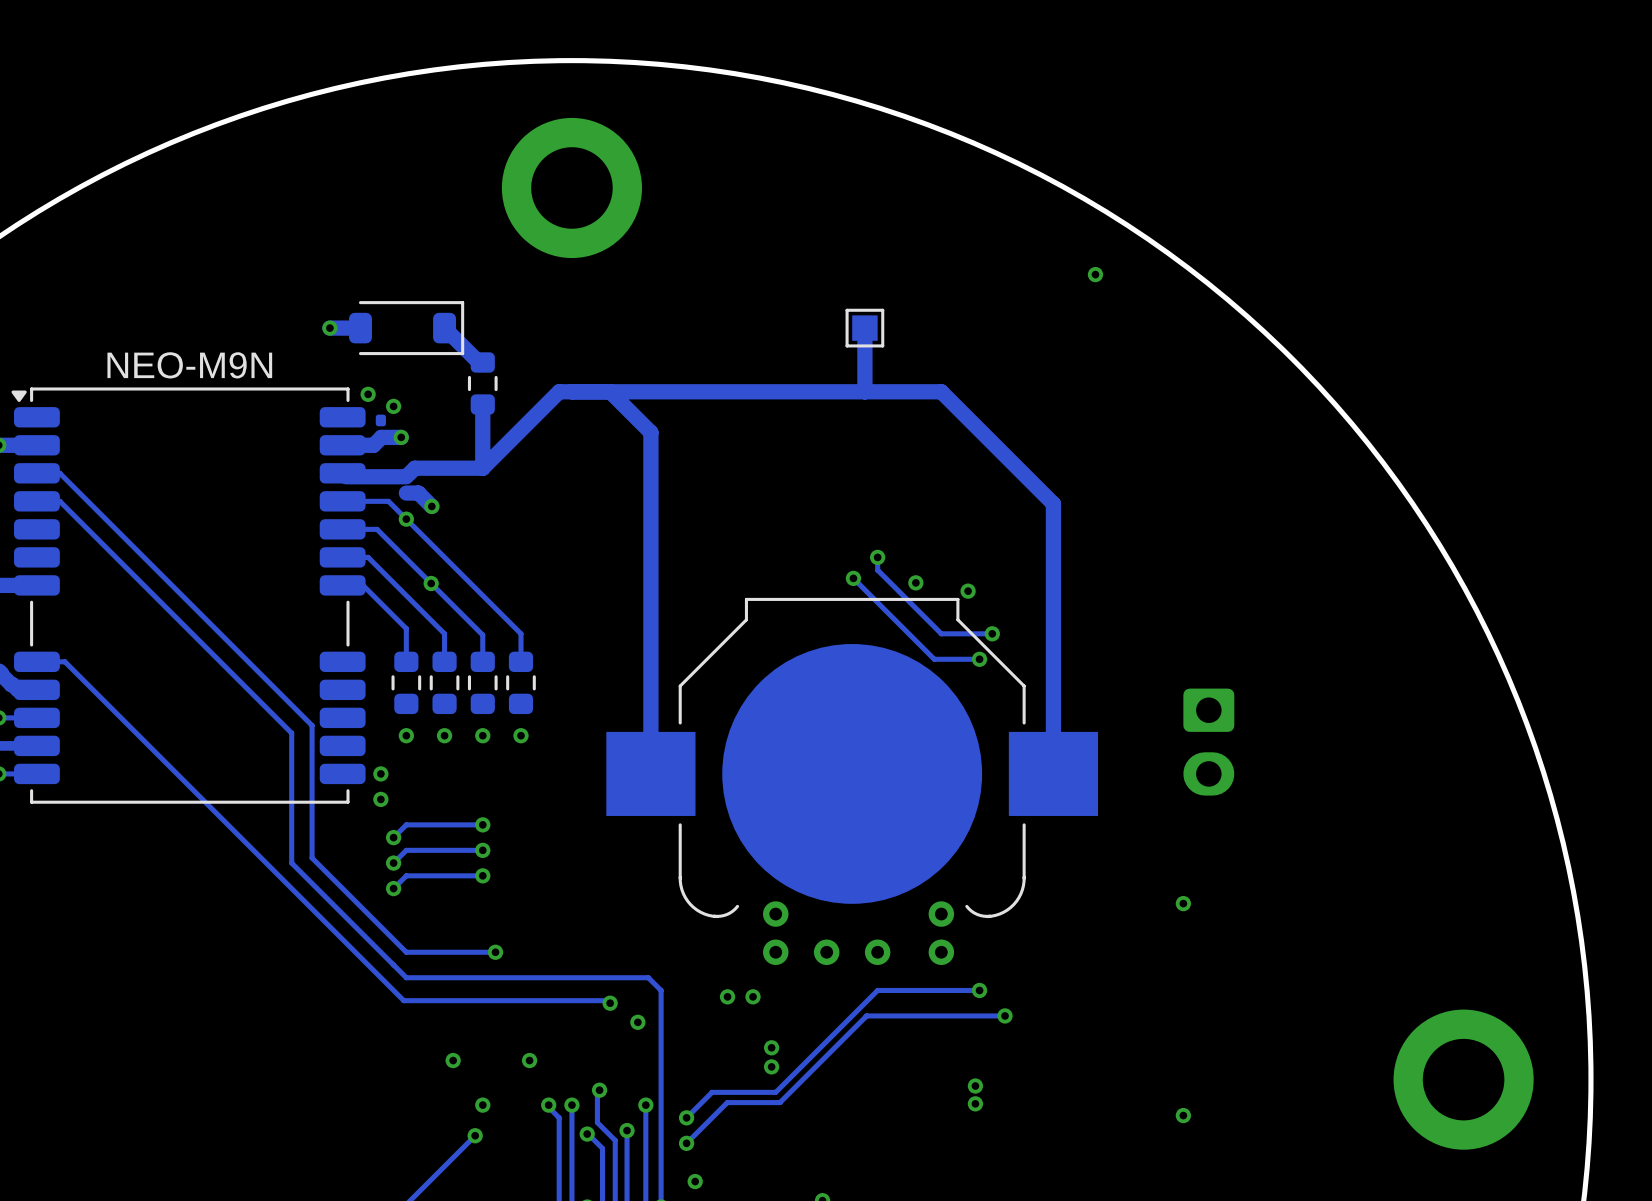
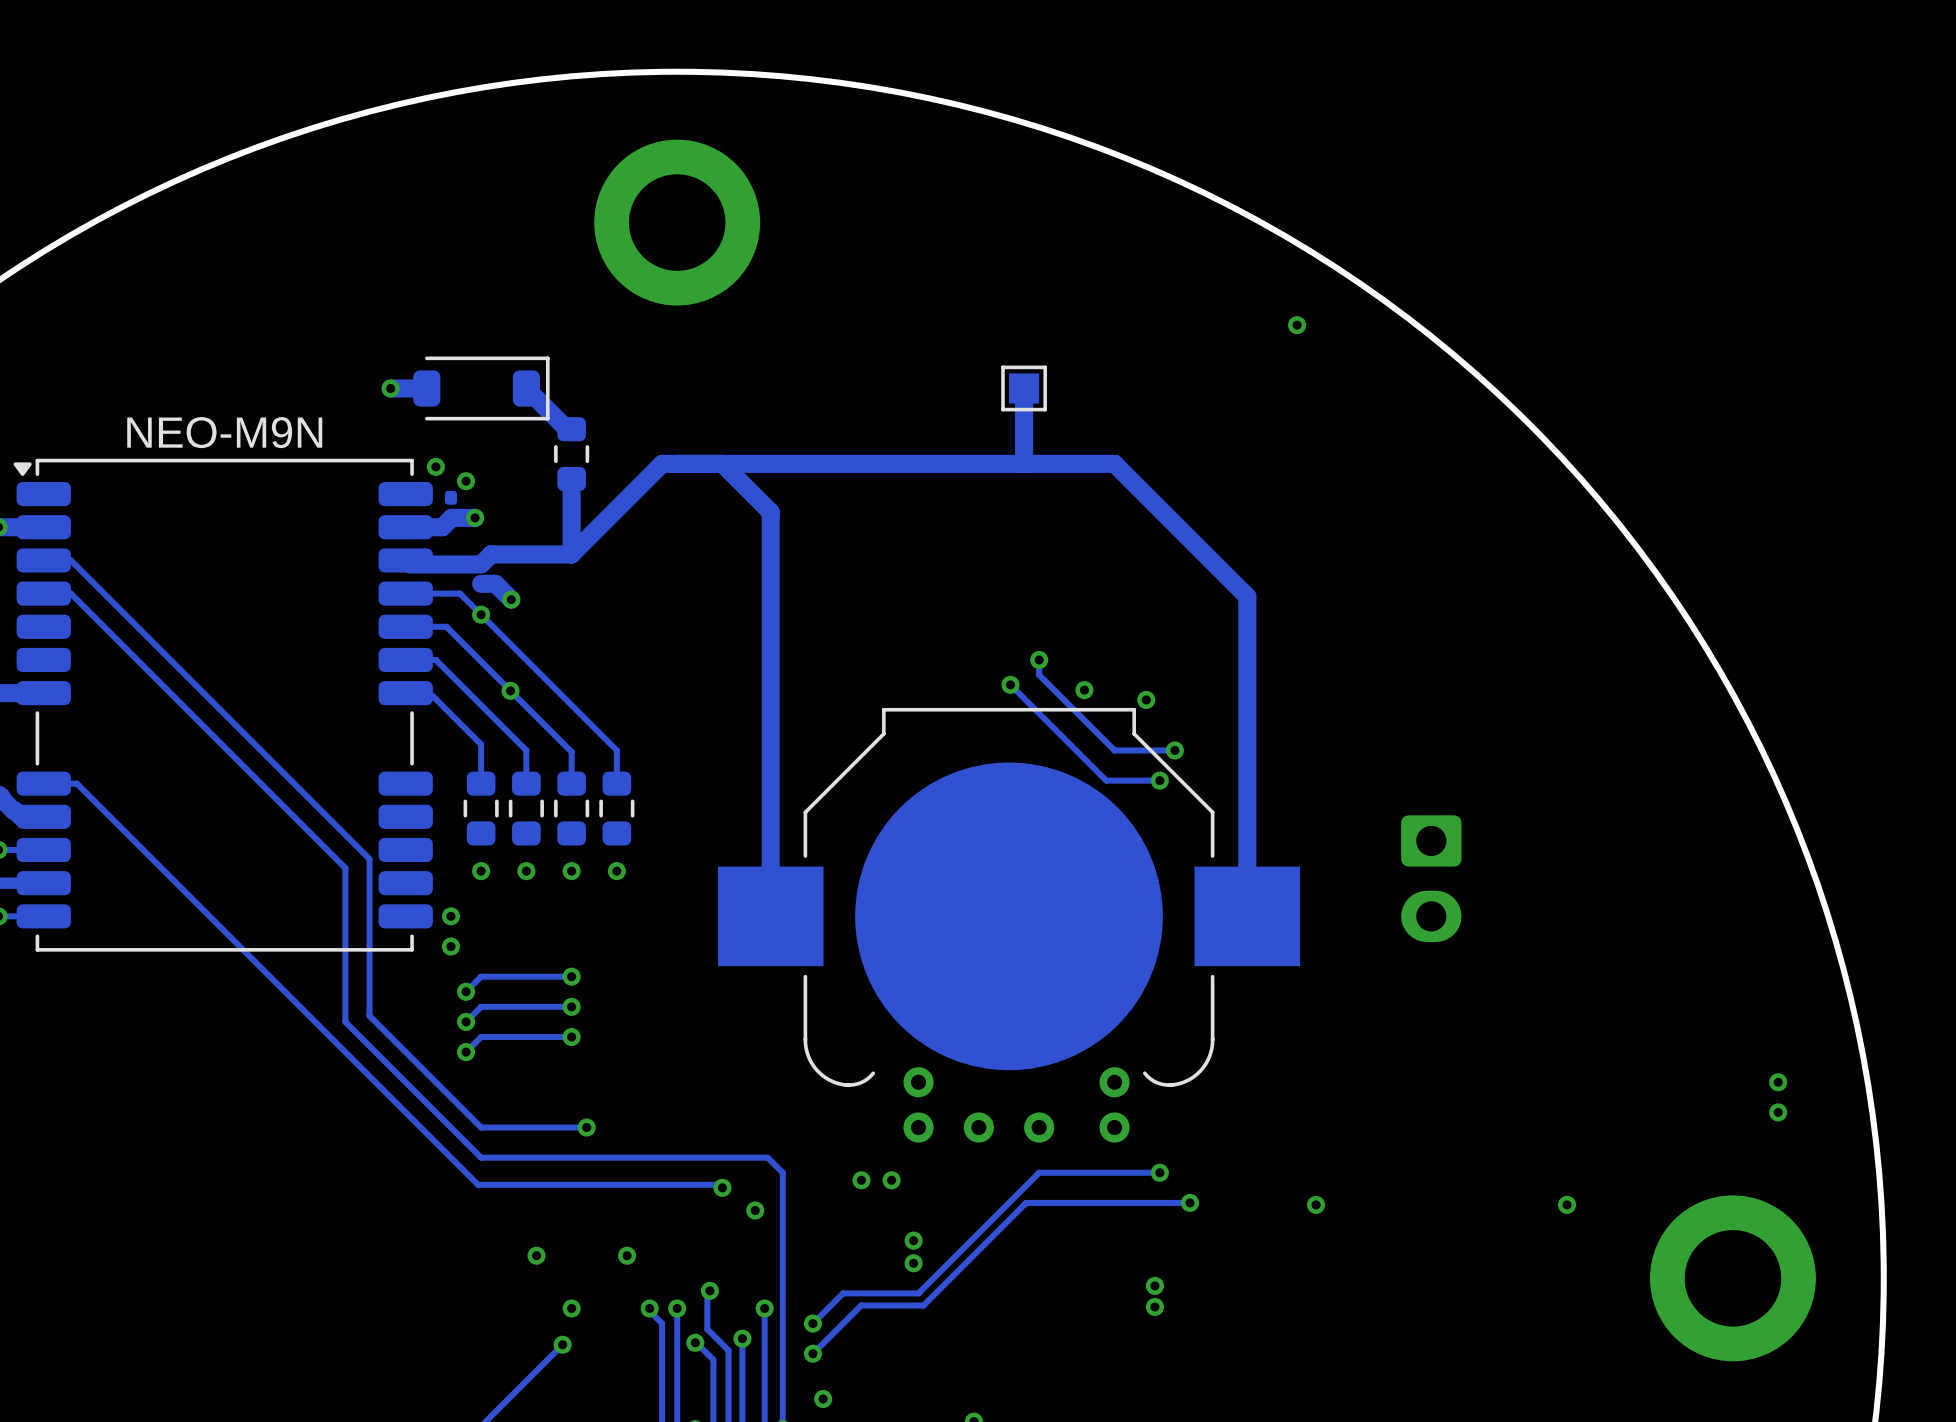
via: (1183, 903) -> none
via: none -> (1778, 1082)
via: none -> (1778, 1112)
via: none -> (1316, 1204)
via: none -> (1567, 1204)
via: (1183, 1115) -> none

